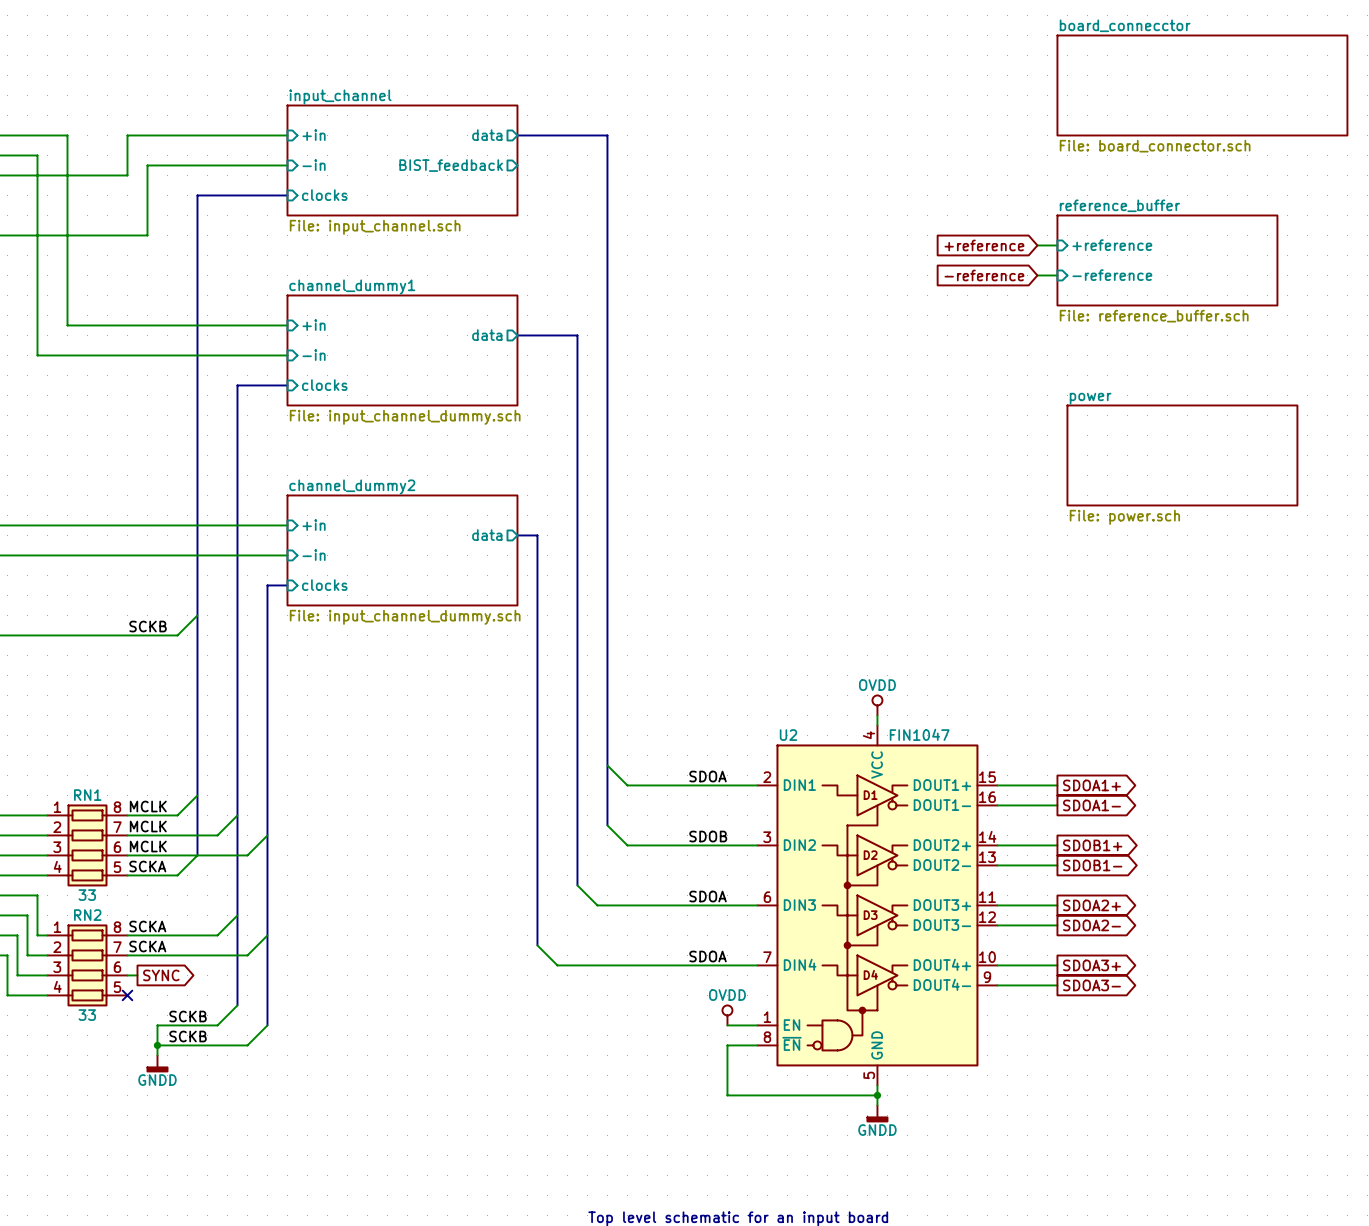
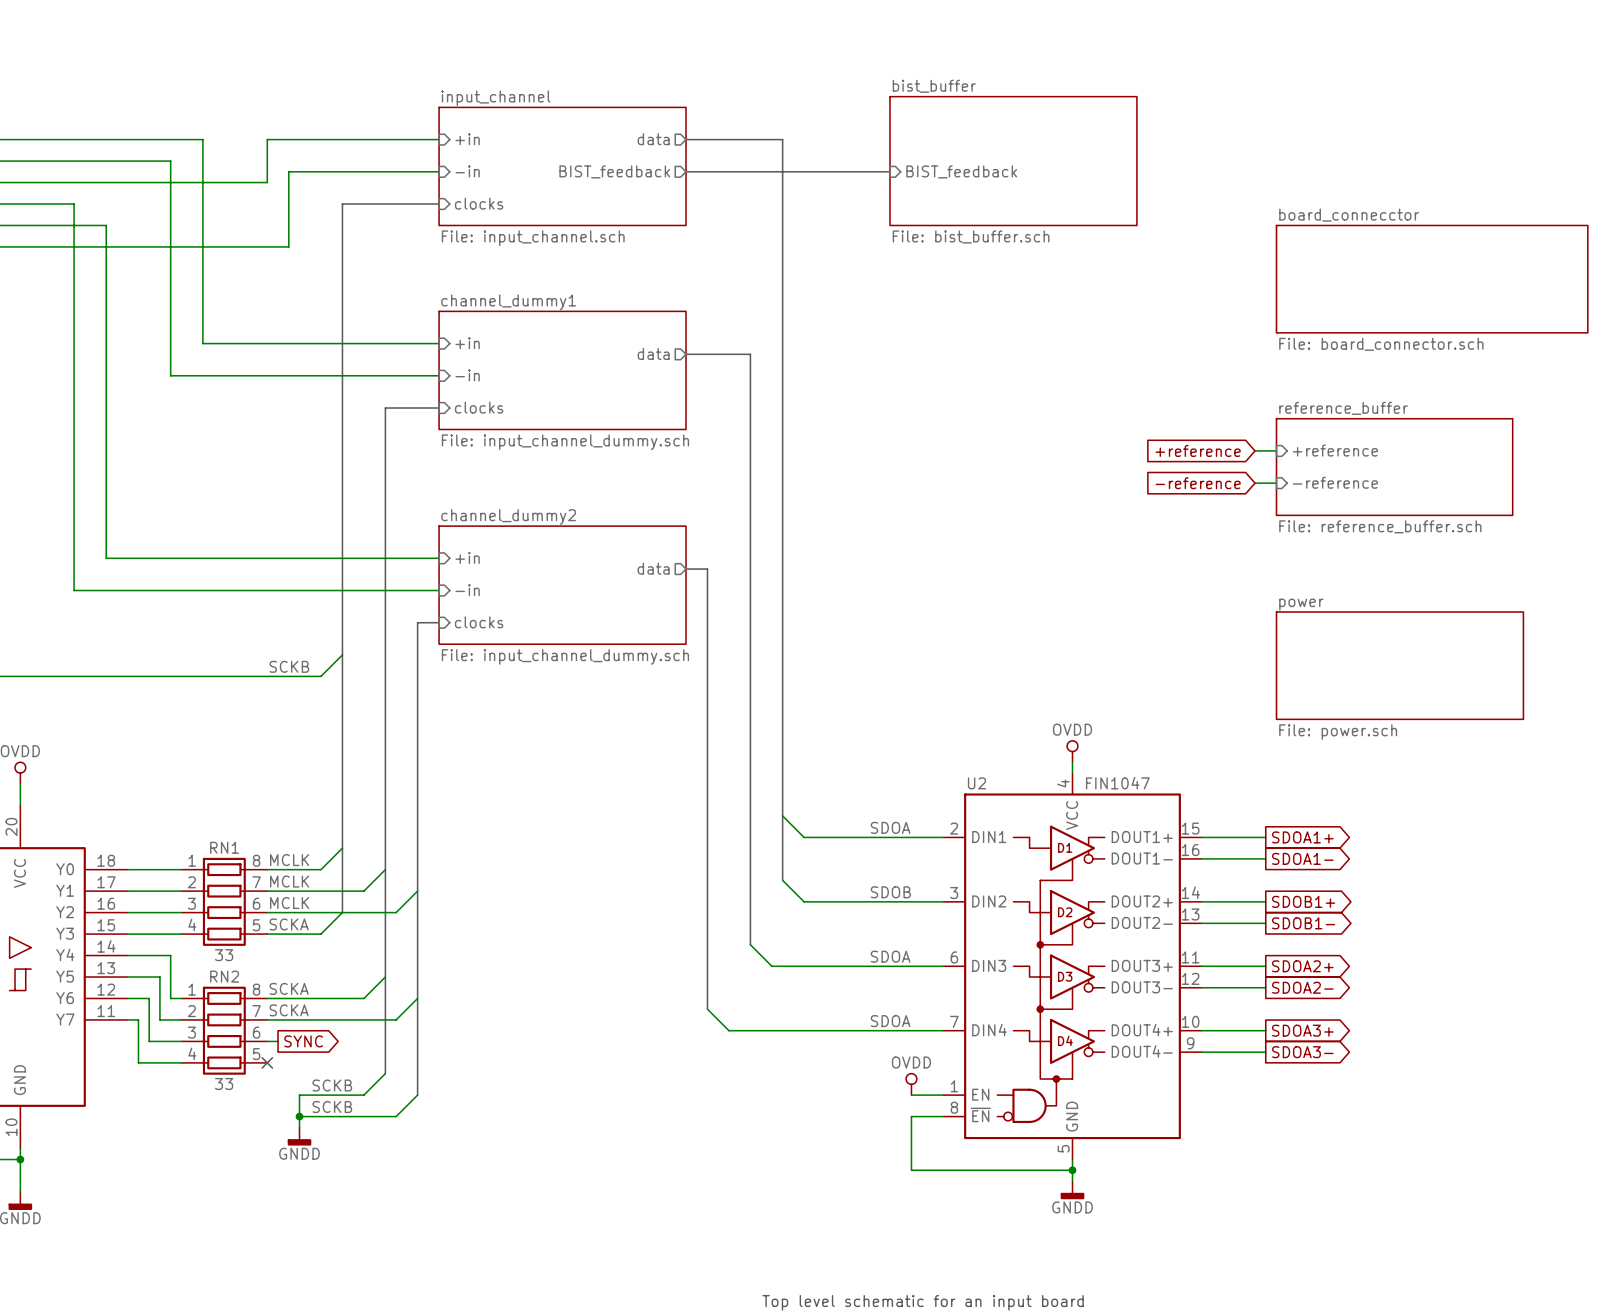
sheet board_connecctor position: (1202, 85) -> (1432, 279)
sheet bist_buffer: none -> File: bist_buffer.sch (1013, 161)
bus: none -> (686, 171) (889, 171)
sheet pin: none -> BIST_feedback (961, 171)
global label position: +reference (984, 245) -> +reference (1198, 450)
wire: (1037, 245) (1057, 245) -> (1255, 450) (1276, 450)
sheet pin position: +reference (1112, 245) -> +reference (1335, 450)
sheet reference_buffer position: (1167, 260) -> (1394, 467)
global label position: -reference (984, 275) -> -reference (1198, 483)
wire: (1037, 275) (1057, 275) -> (1255, 483) (1276, 483)
sheet pin position: -reference (1112, 275) -> -reference (1335, 482)
sheet power position: (1182, 455) -> (1399, 665)

